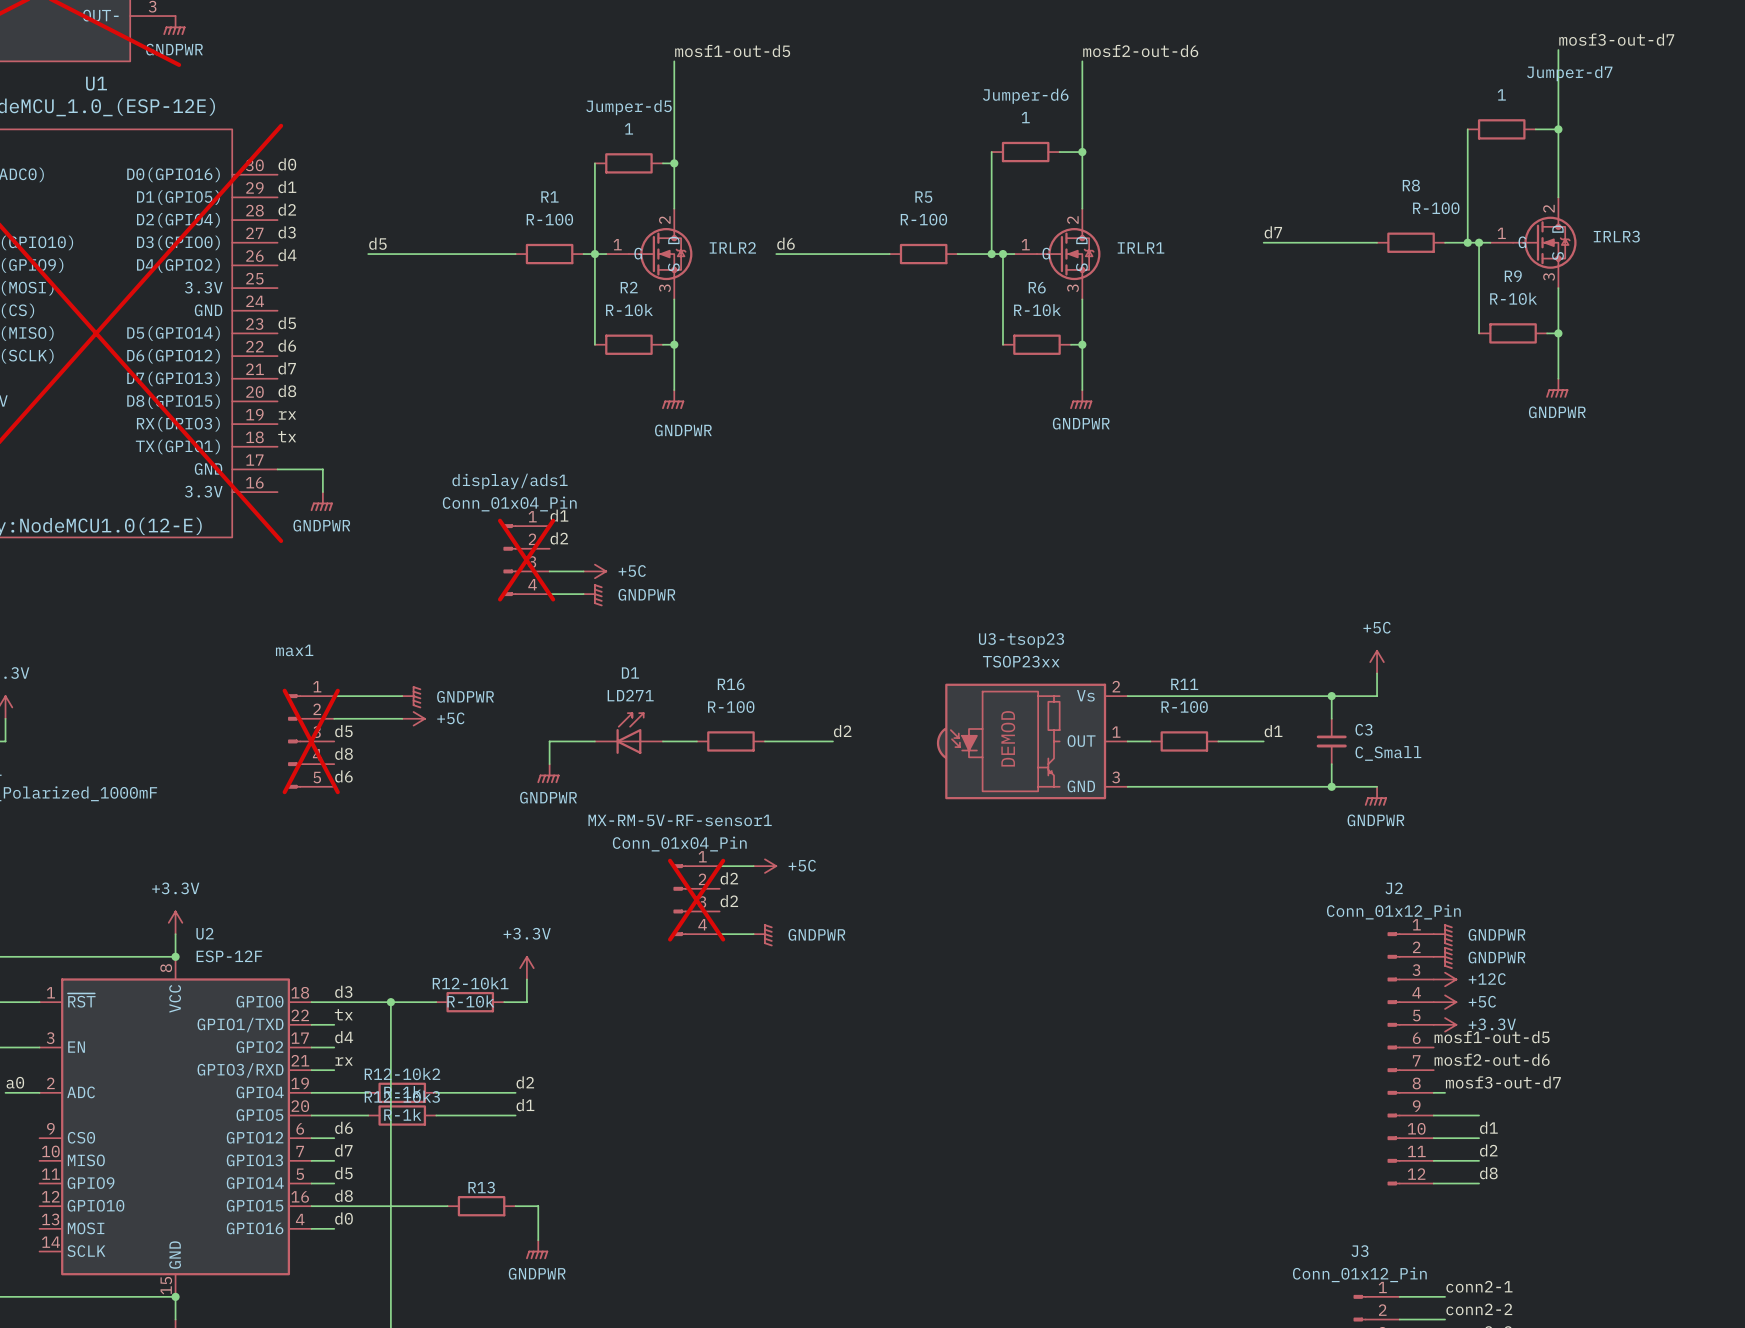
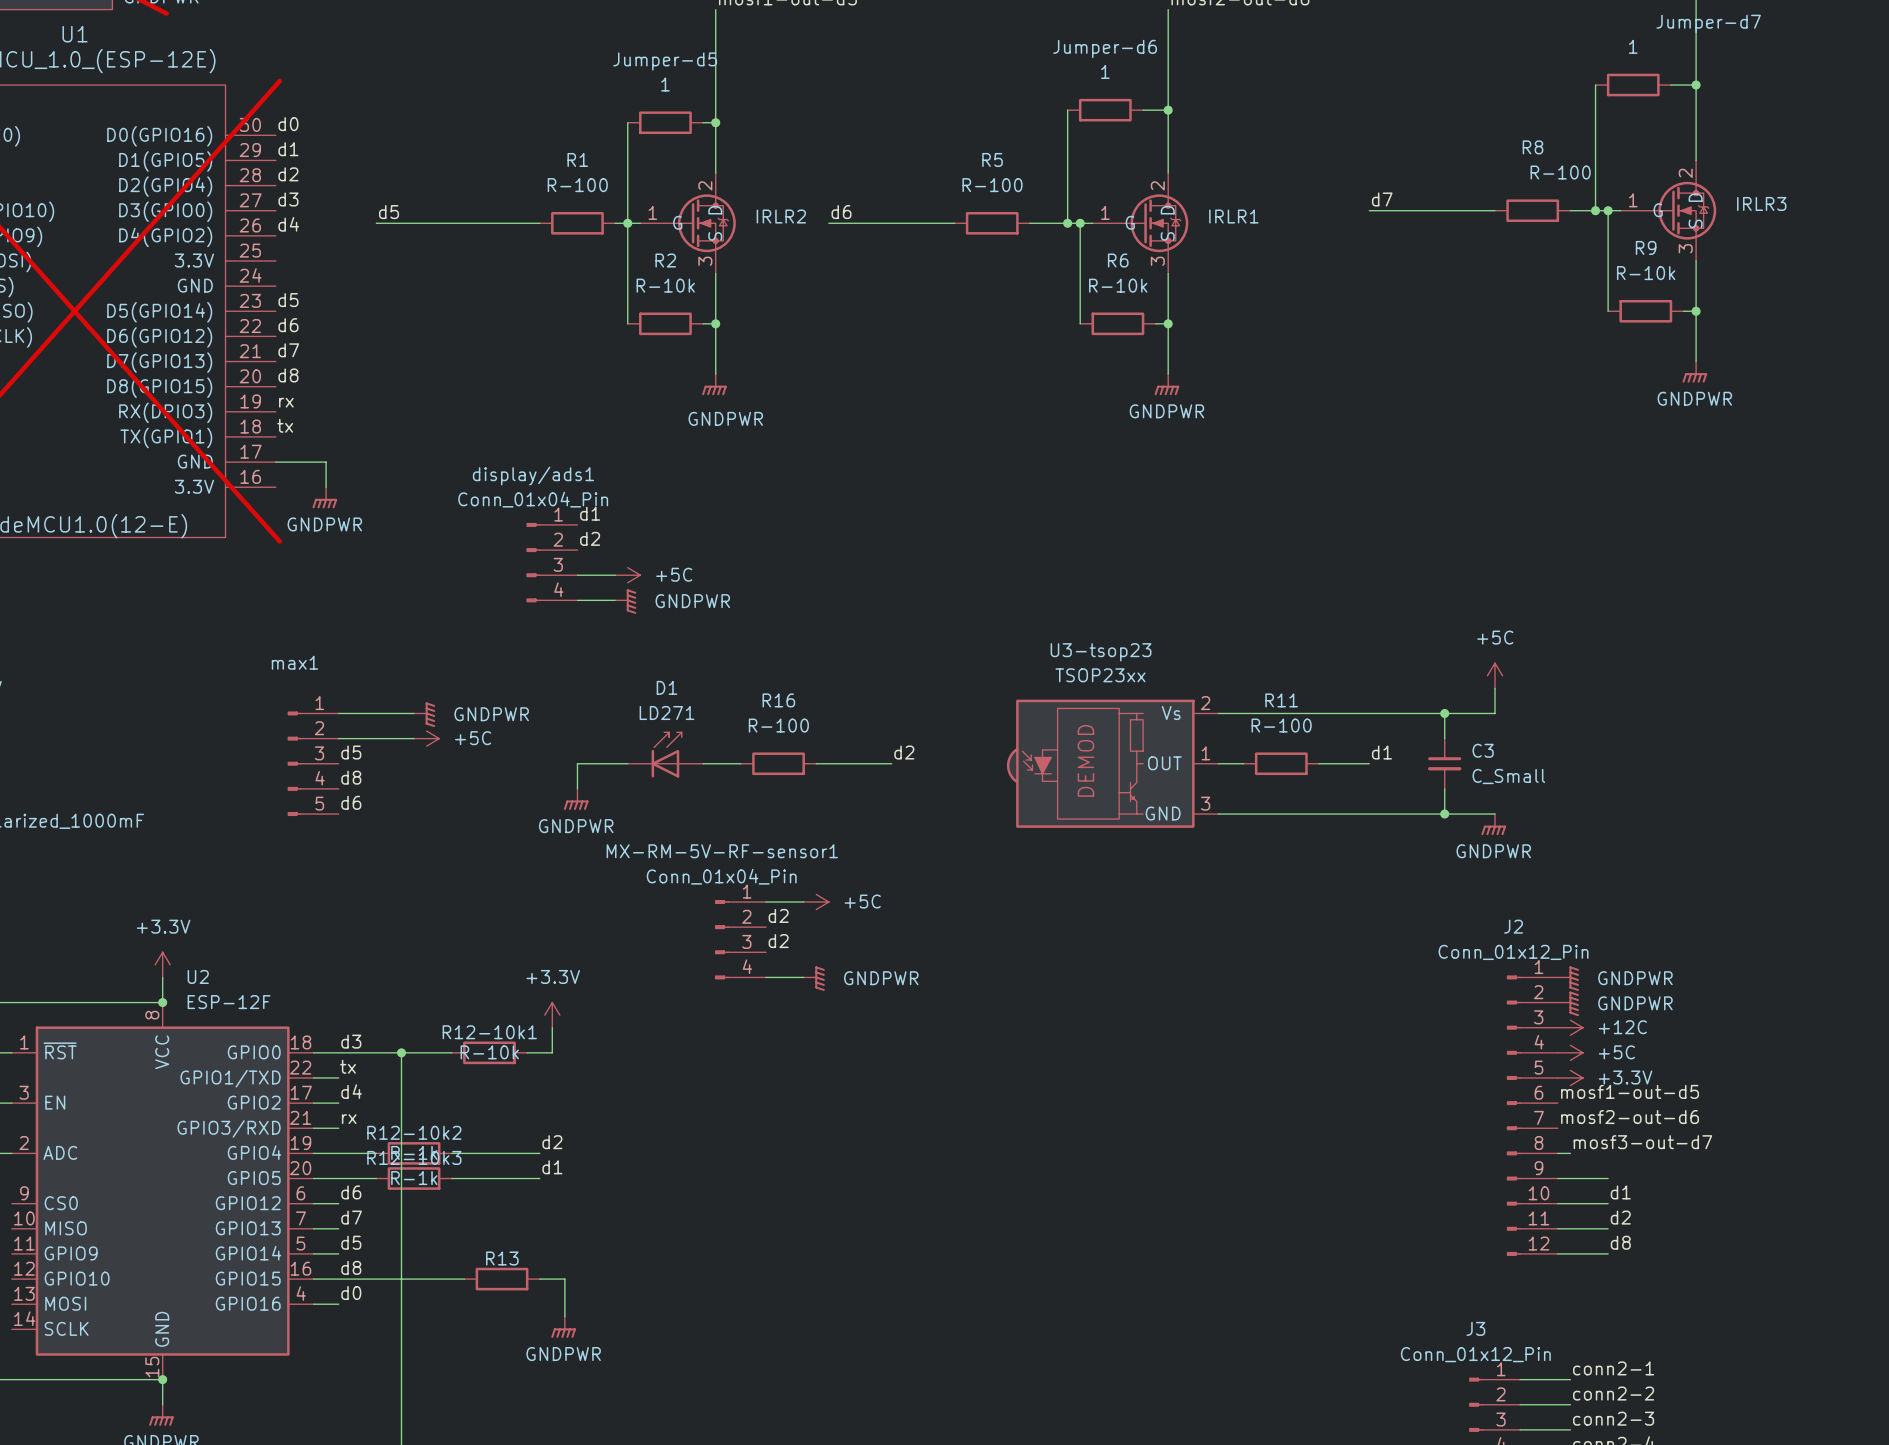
display/ads1 do-not-place cross: (526, 560) -> none
max1 do-not-place cross: (311, 741) -> none
MX-RM-5V-RF-sensor1 do-not-place cross: (696, 900) -> none

